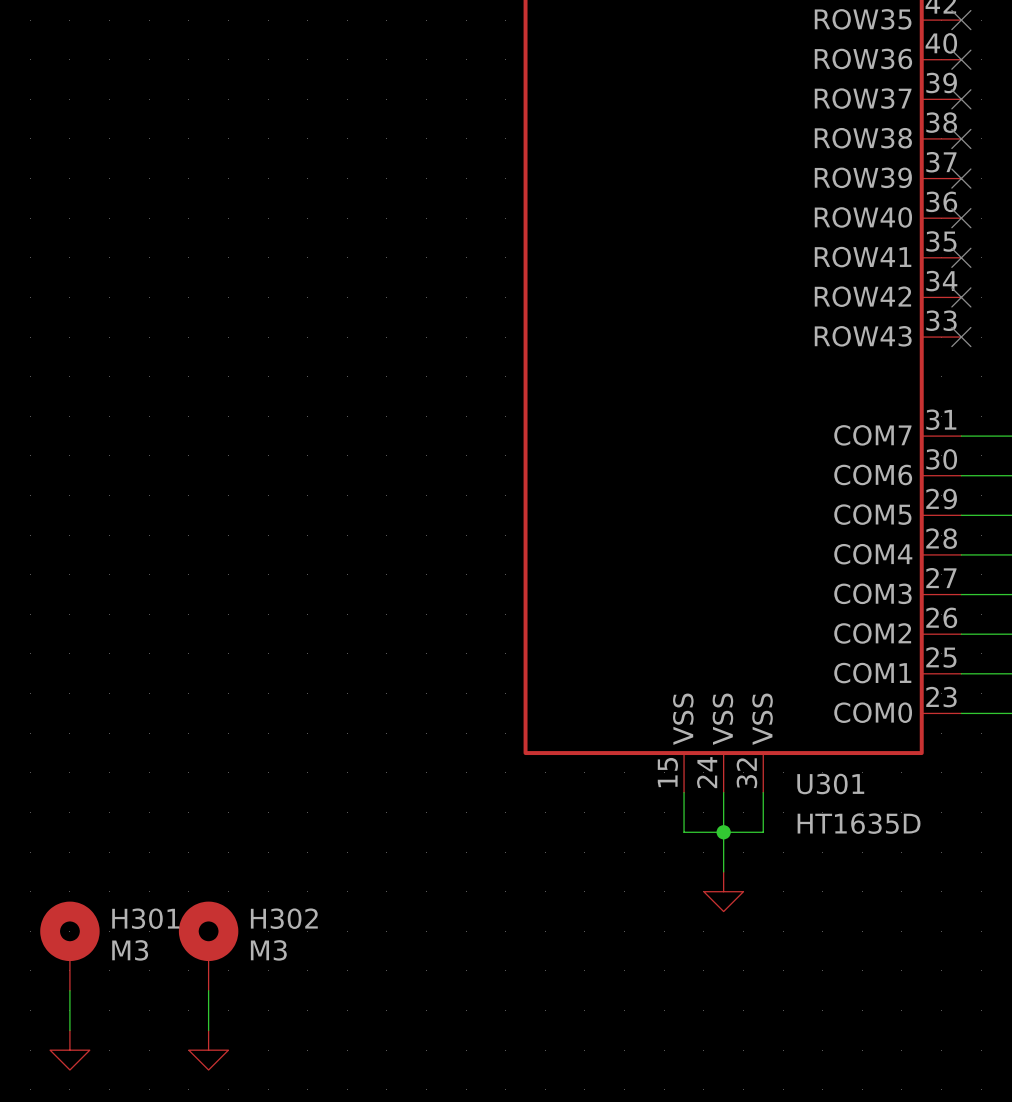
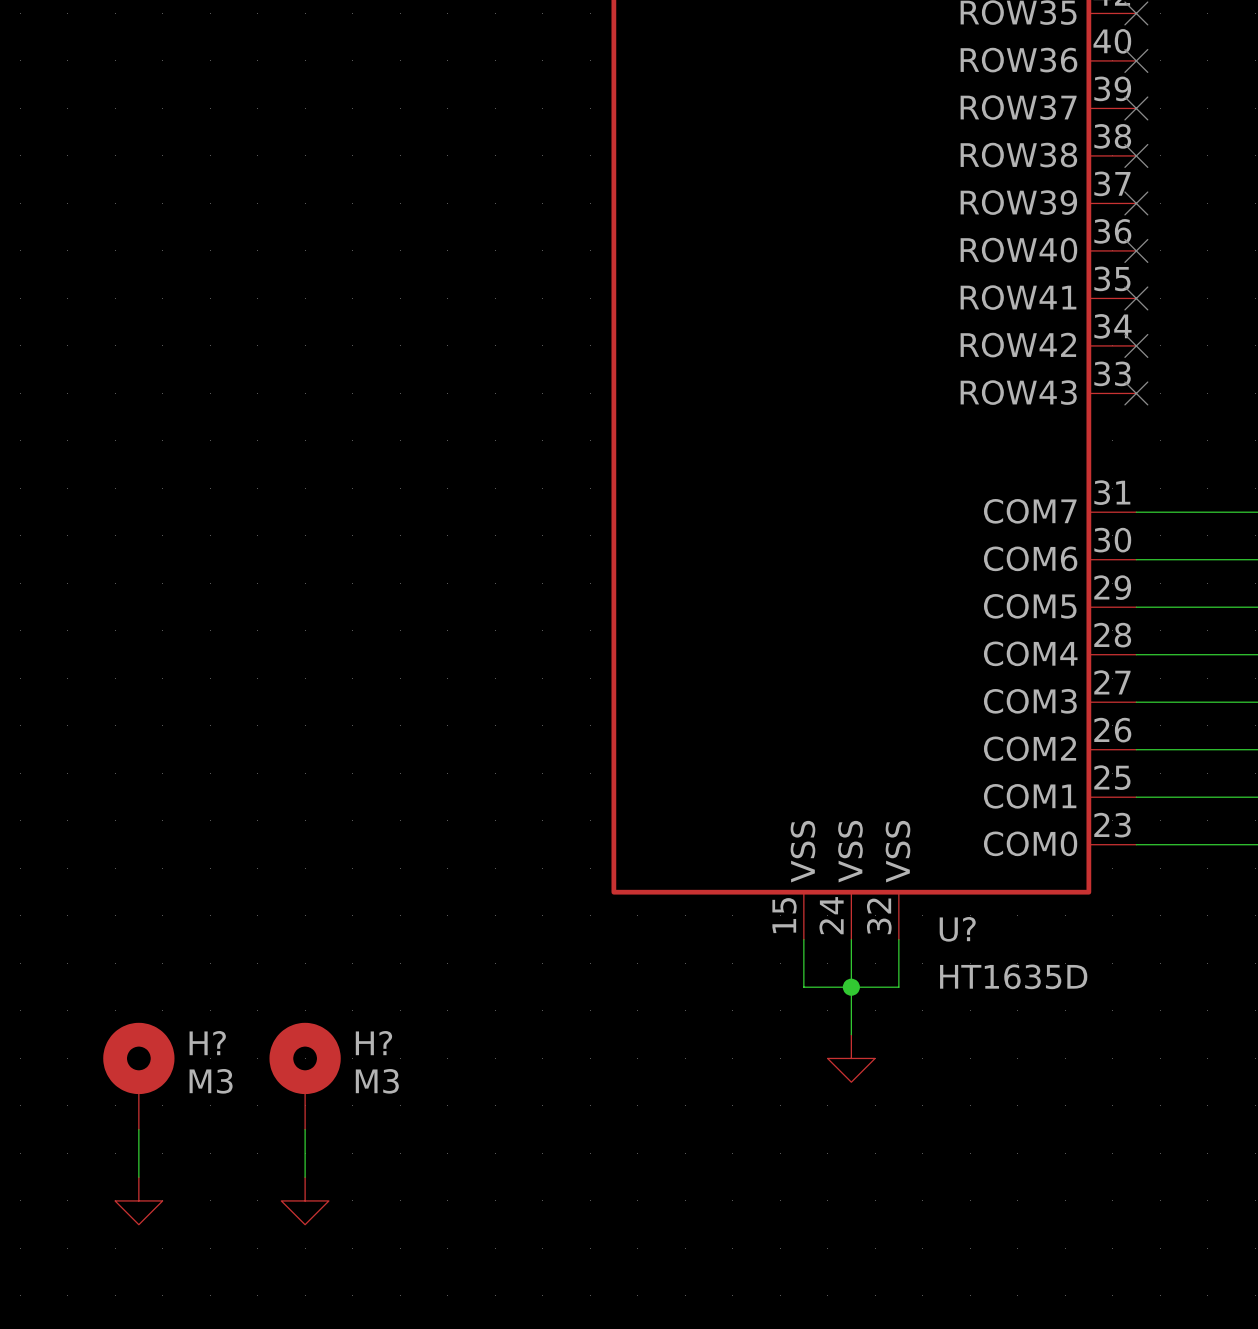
U301 name: U301 (830, 784) -> U? (957, 929)
H?: none -> M3 (138, 1076)
H?: none -> M3 (305, 1076)
H301: M3 (69, 946) -> none
H302: M3 (208, 946) -> none
wire: (69, 990) (69, 1030) -> (138, 1129) (138, 1177)
wire: (208, 990) (208, 1030) -> (305, 1129) (305, 1177)
power symbol: none -> (138, 1200)
power symbol: none -> (305, 1200)
power symbol: (69, 1050) -> none
power symbol: (208, 1050) -> none

